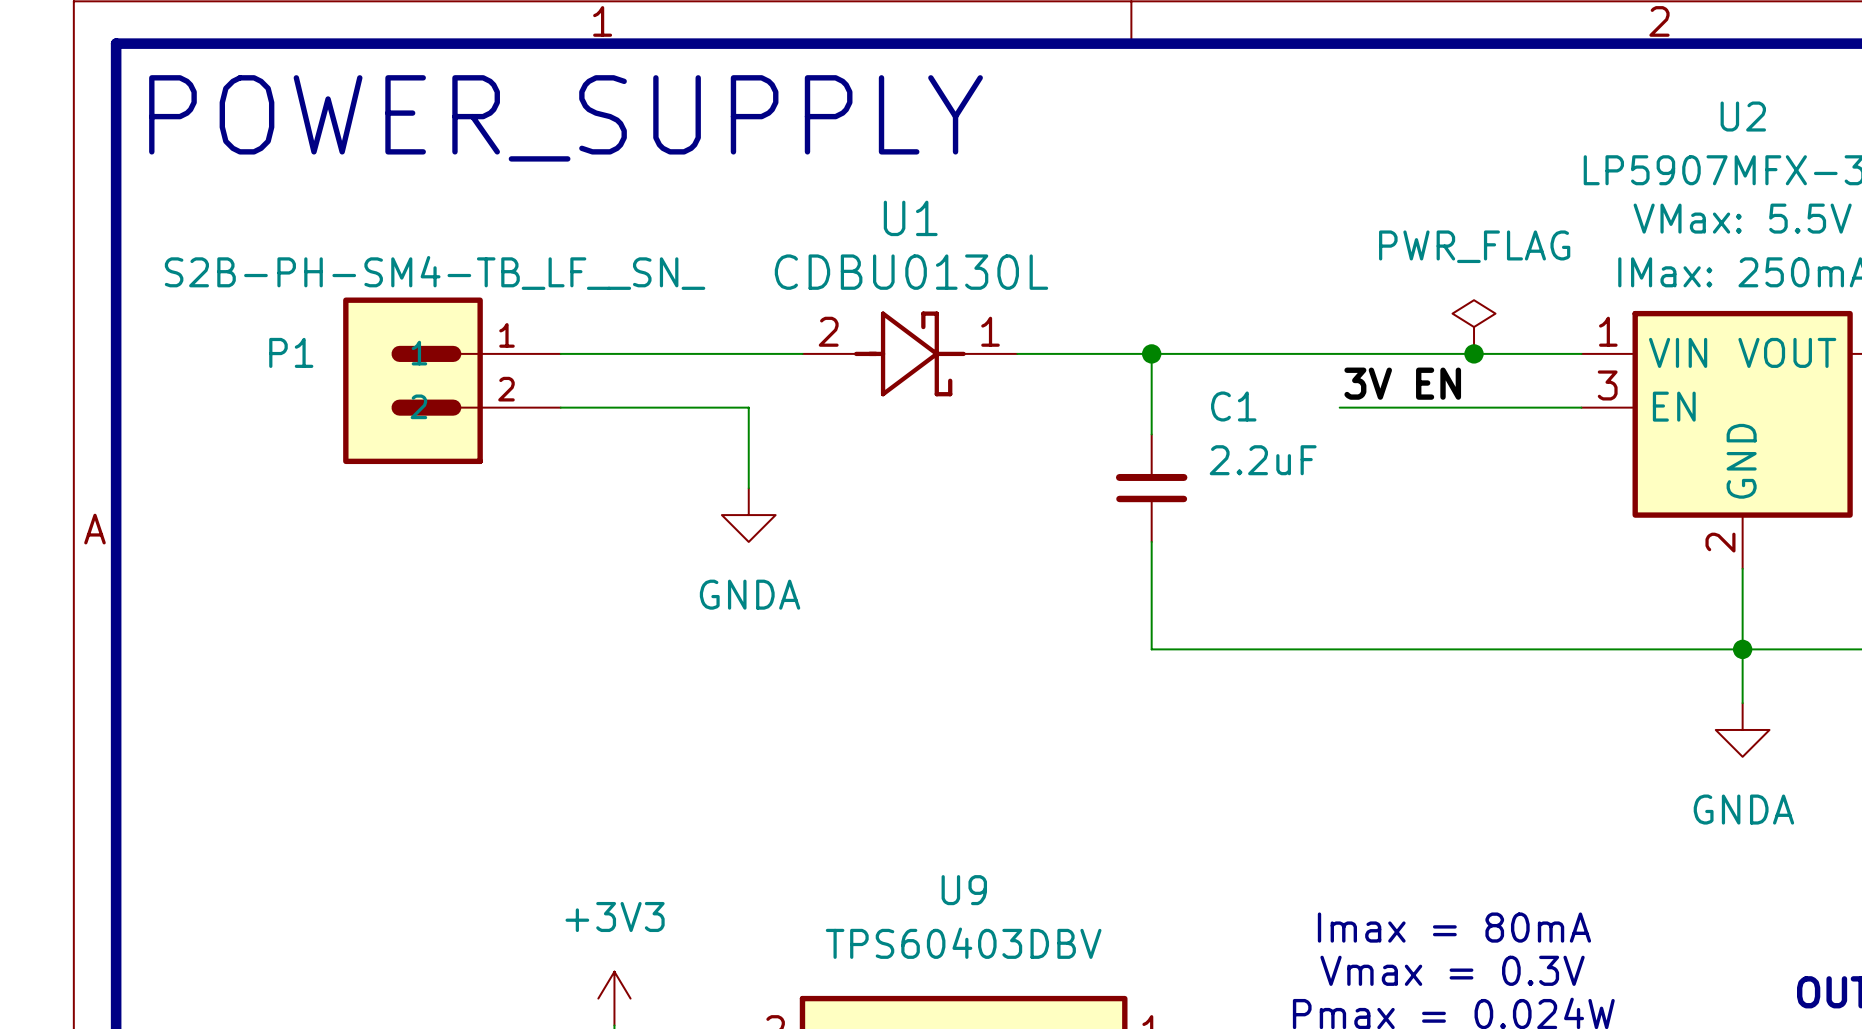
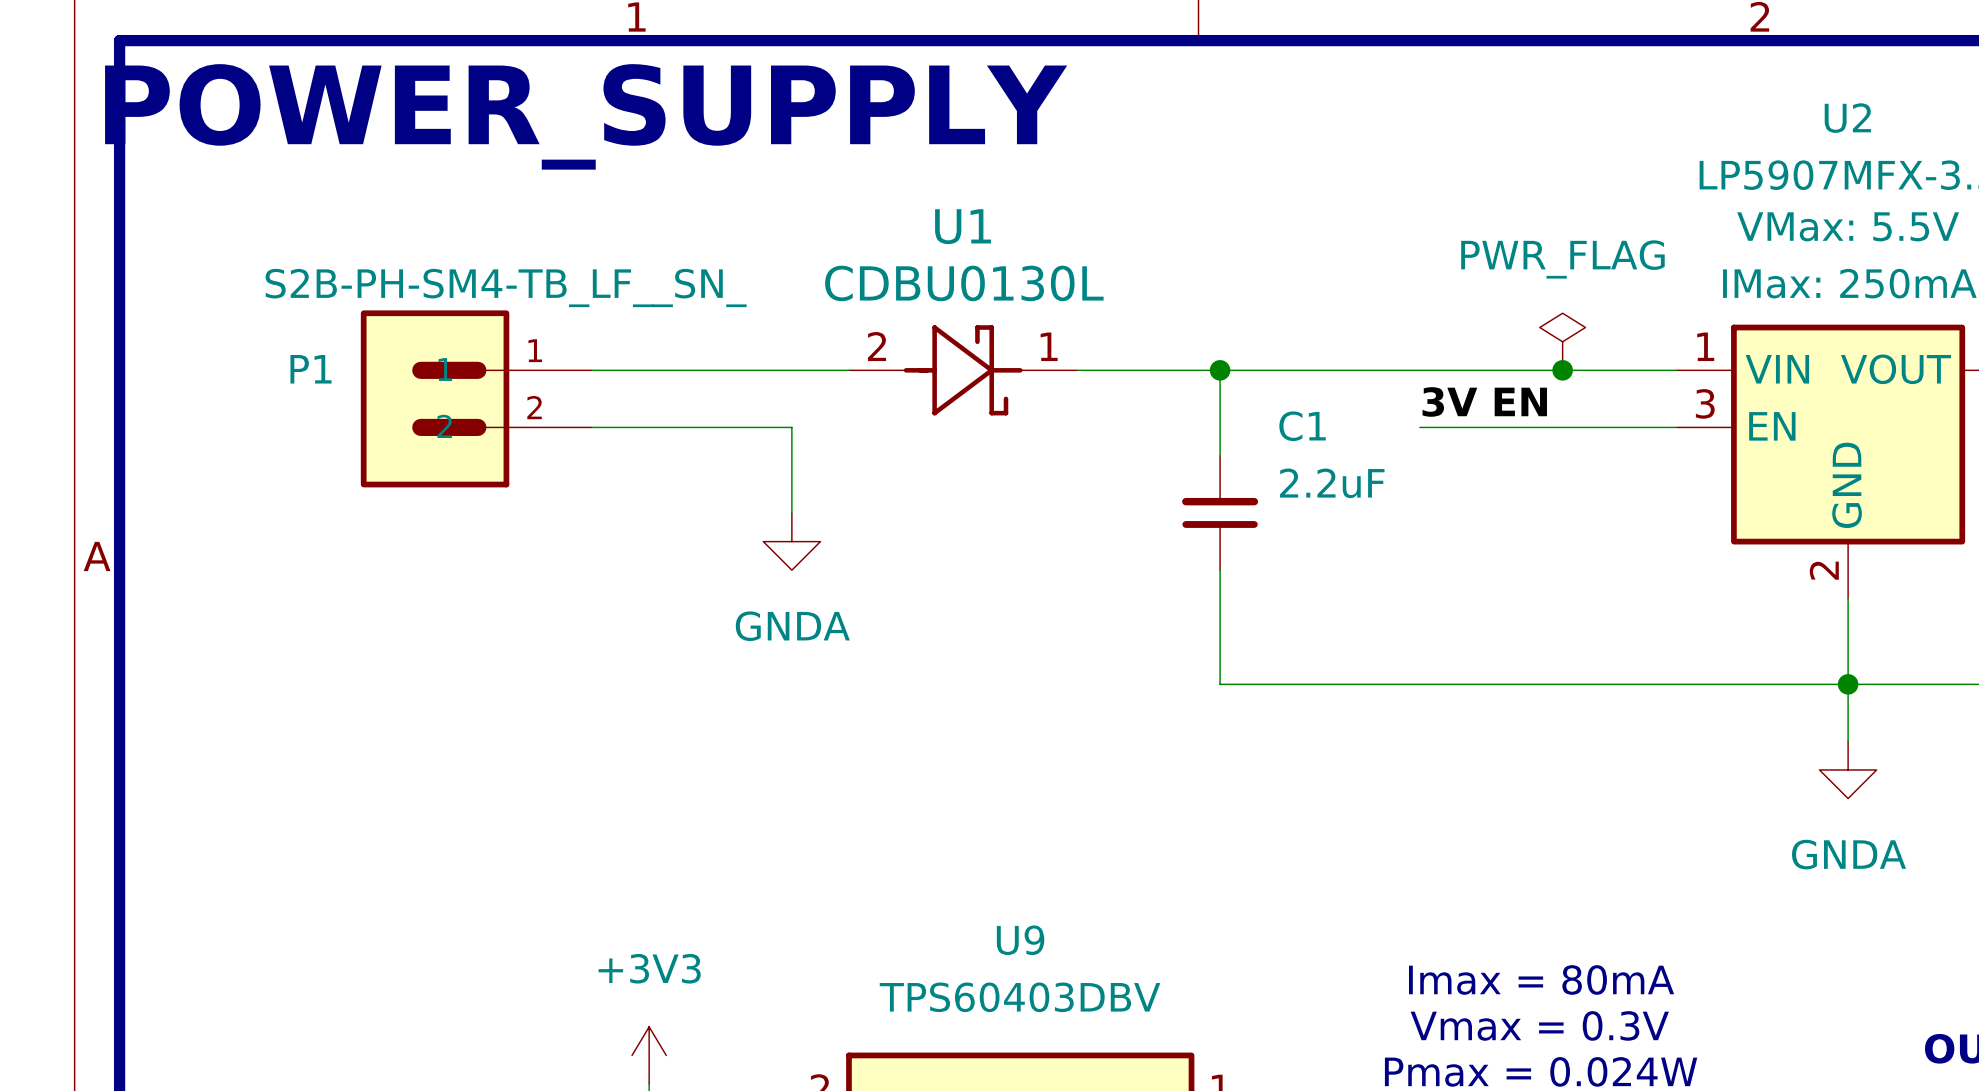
text position: POWER_SUPPLY (566, 118) -> POWER_SUPPLY (586, 116)

